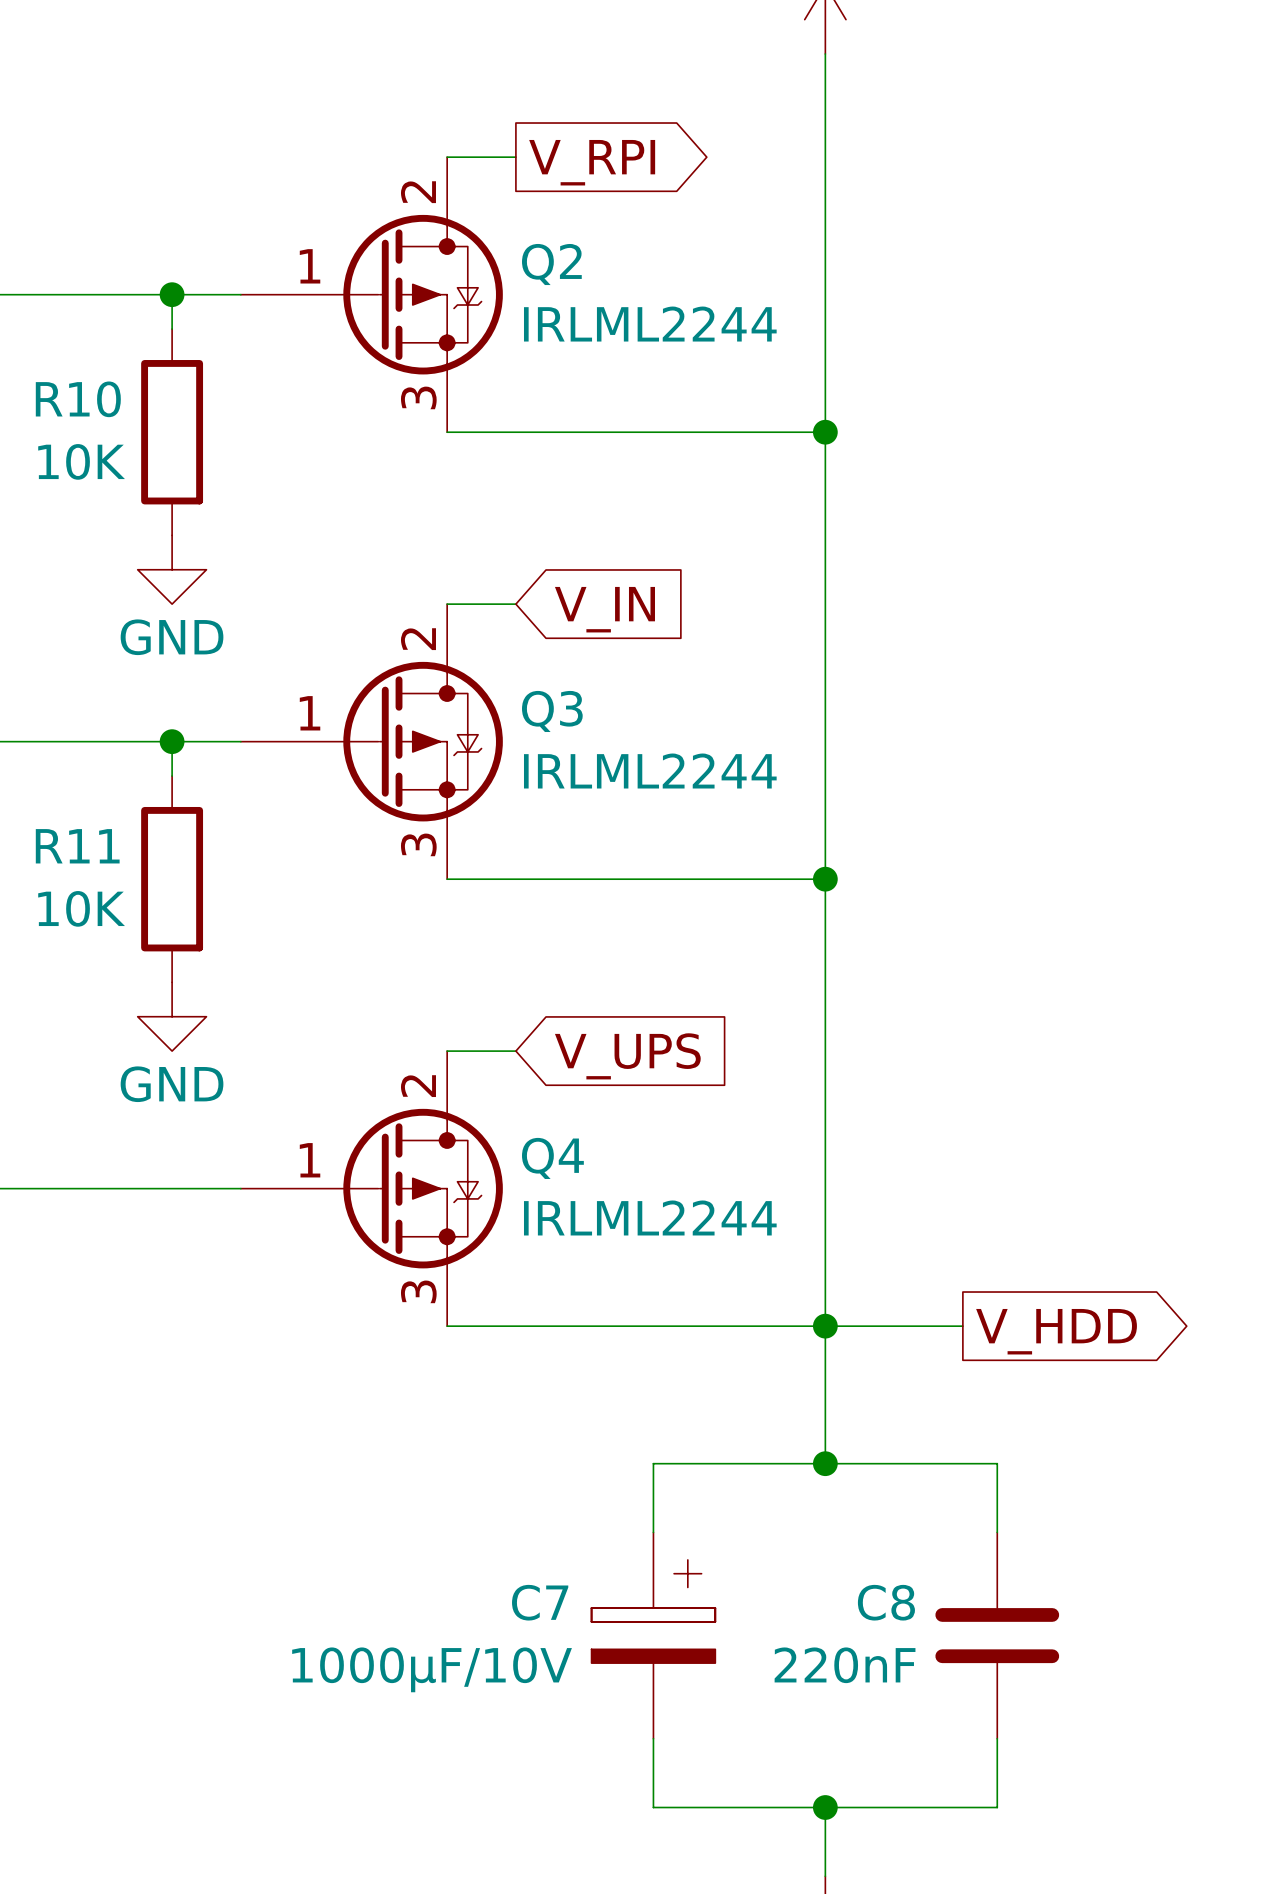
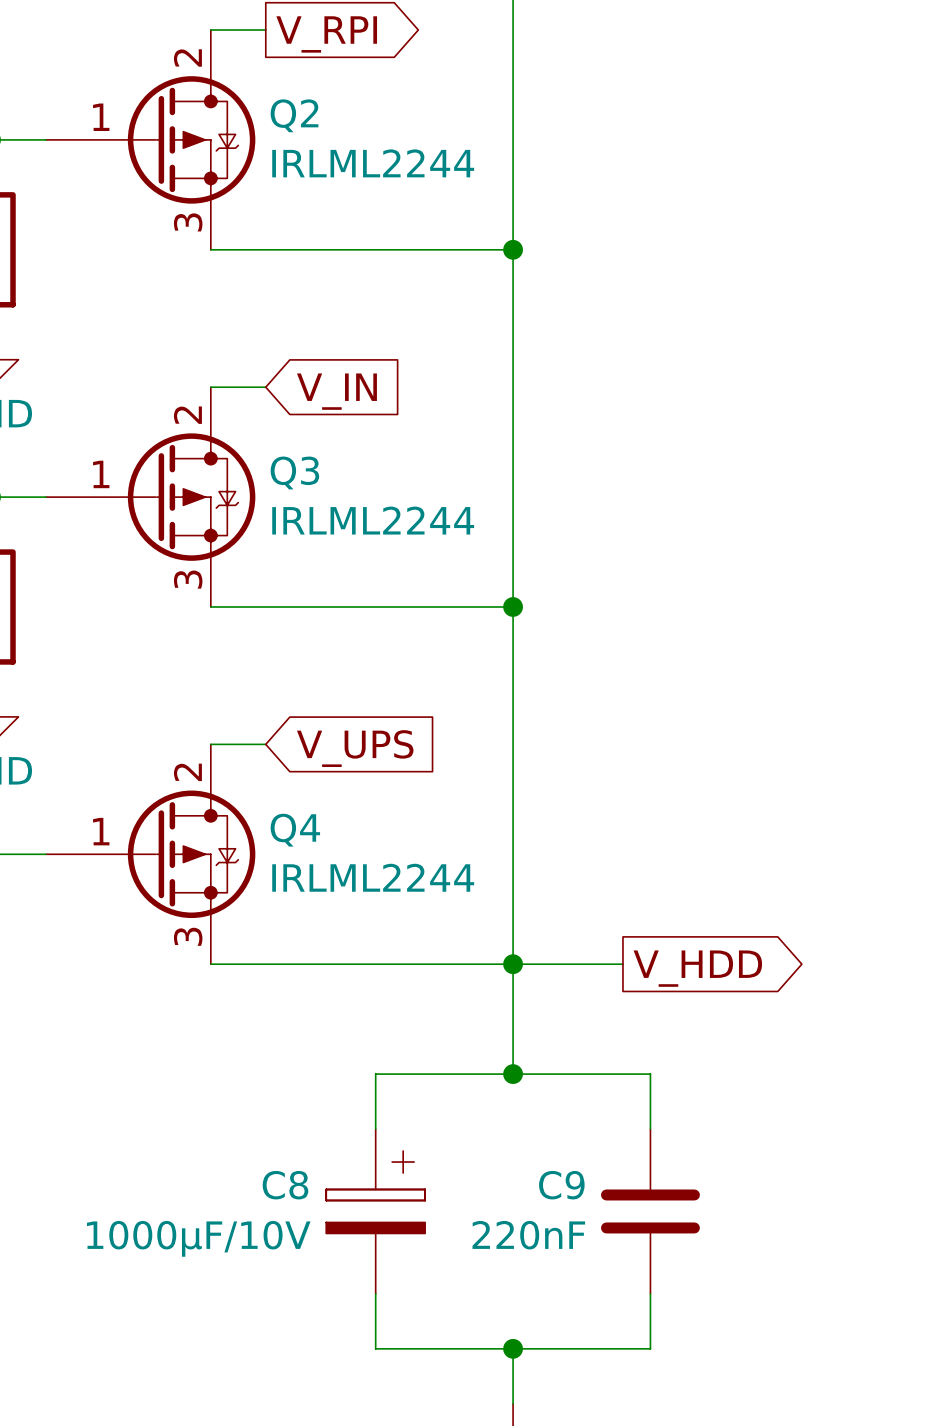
C7 name: C7 (540, 1602) -> C8 (285, 1185)
C8 name: C8 (886, 1602) -> C9 (561, 1185)

